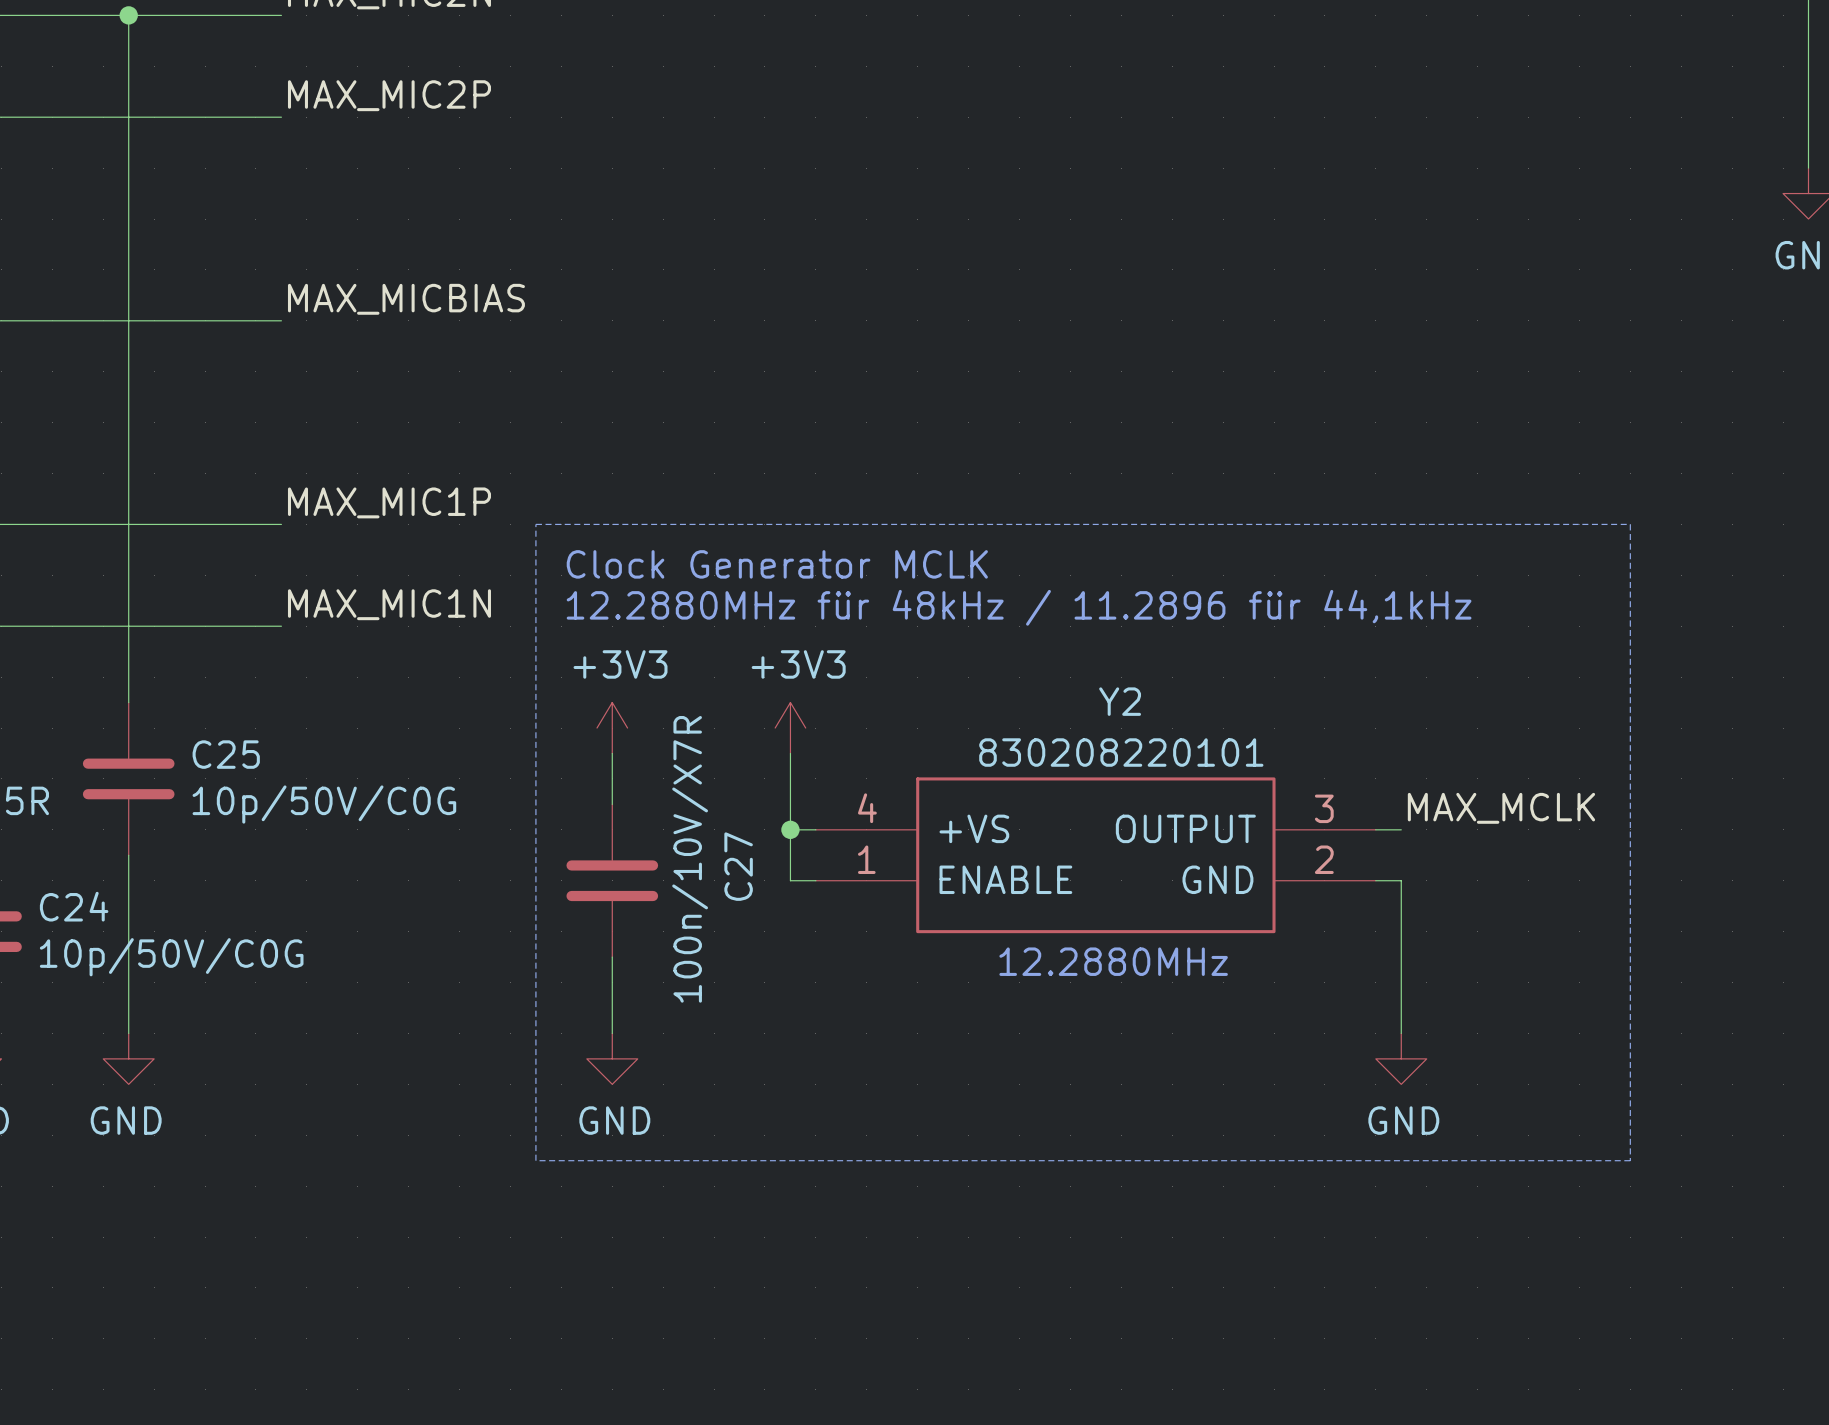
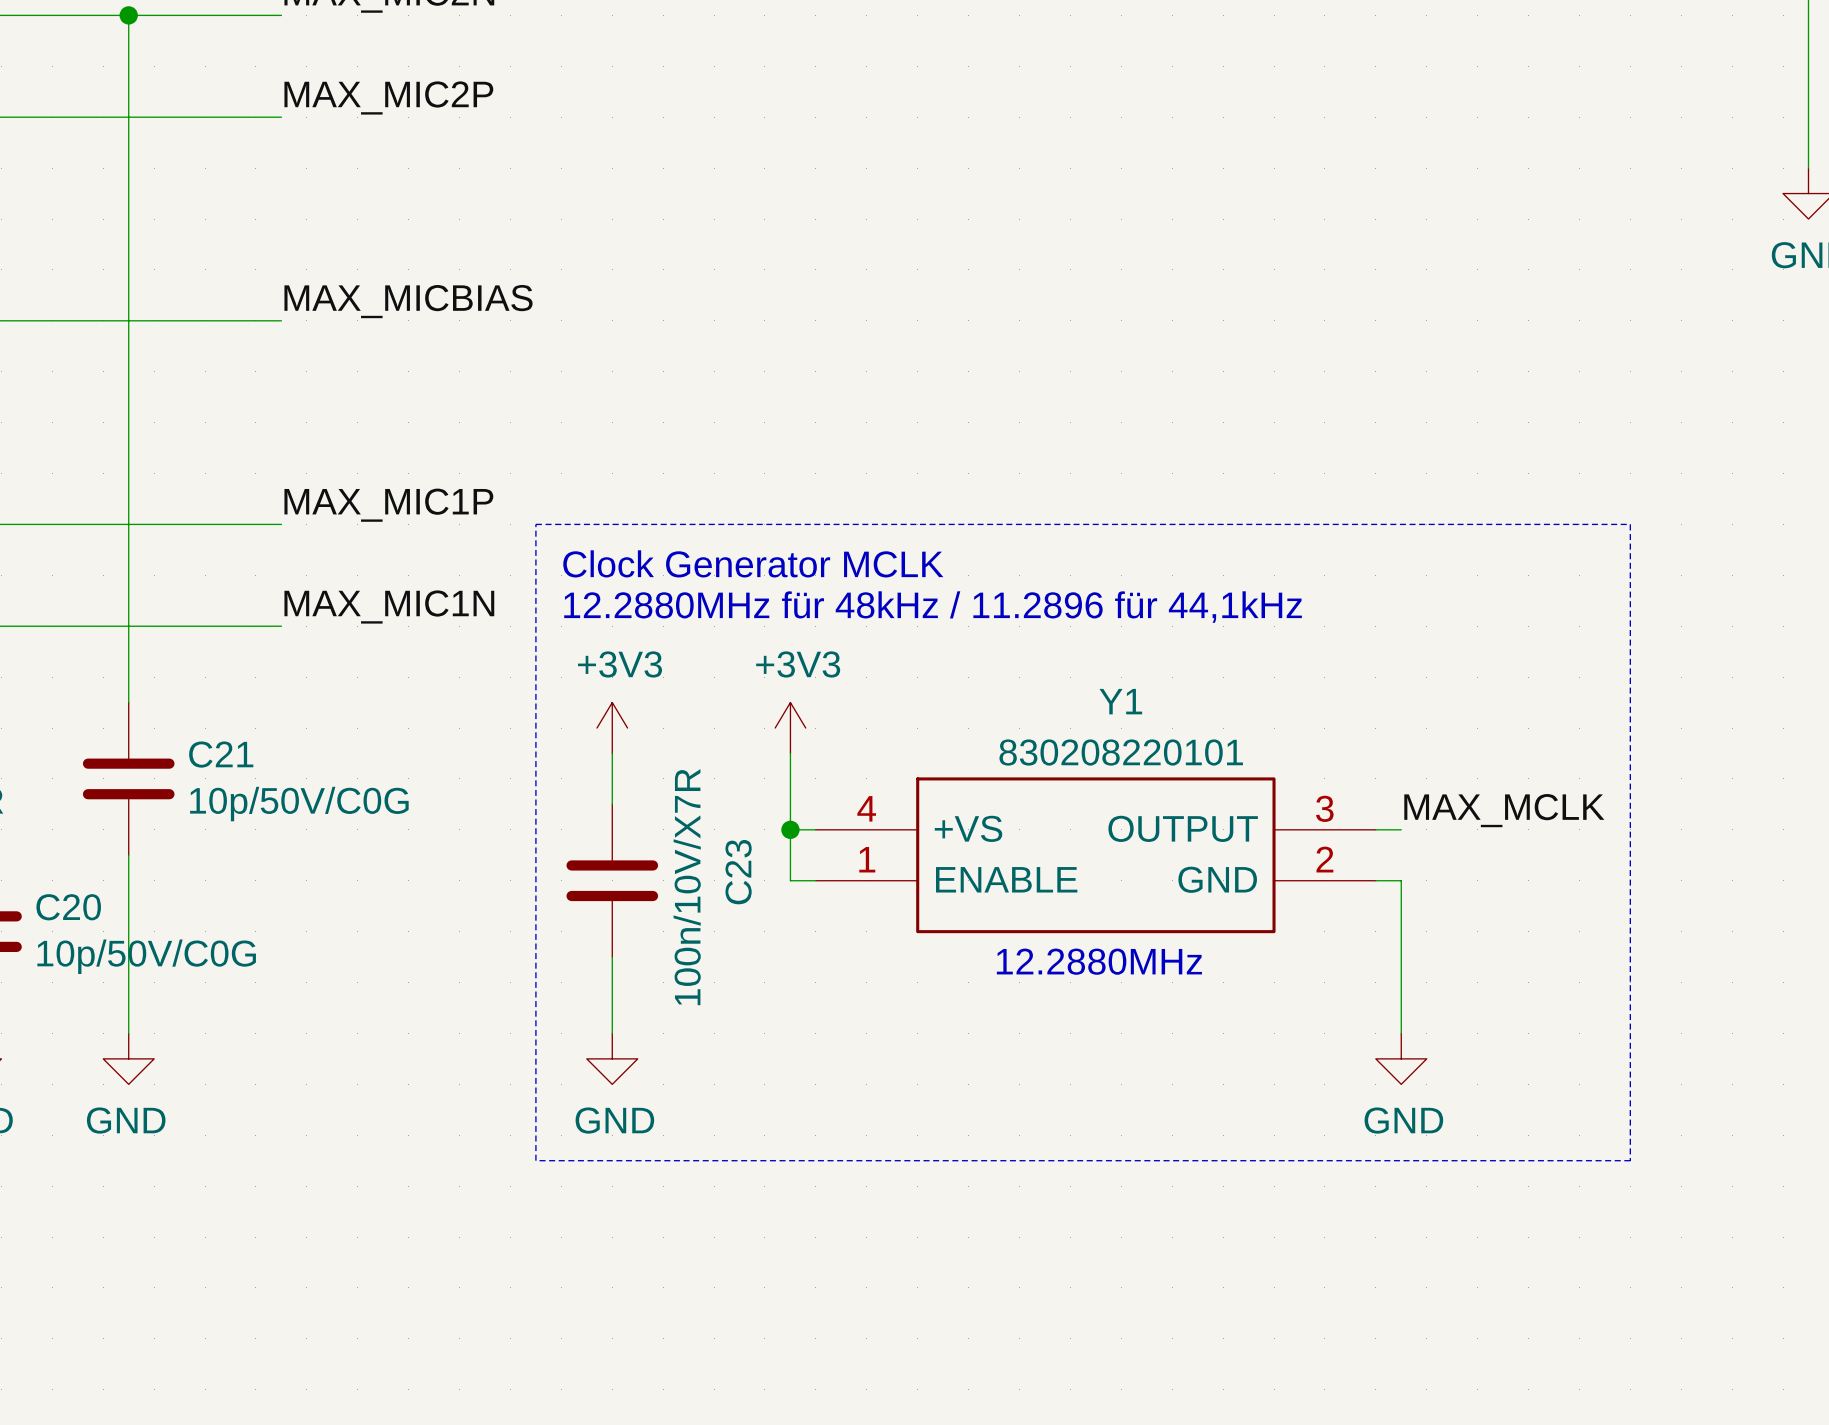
Y2 name: Y2 (1120, 701) -> Y1 (1120, 701)
C25 name: C25 (226, 754) -> C21 (221, 754)
C27 name: C27 (738, 866) -> C23 (738, 872)
C24 name: C24 (74, 906) -> C20 (68, 907)

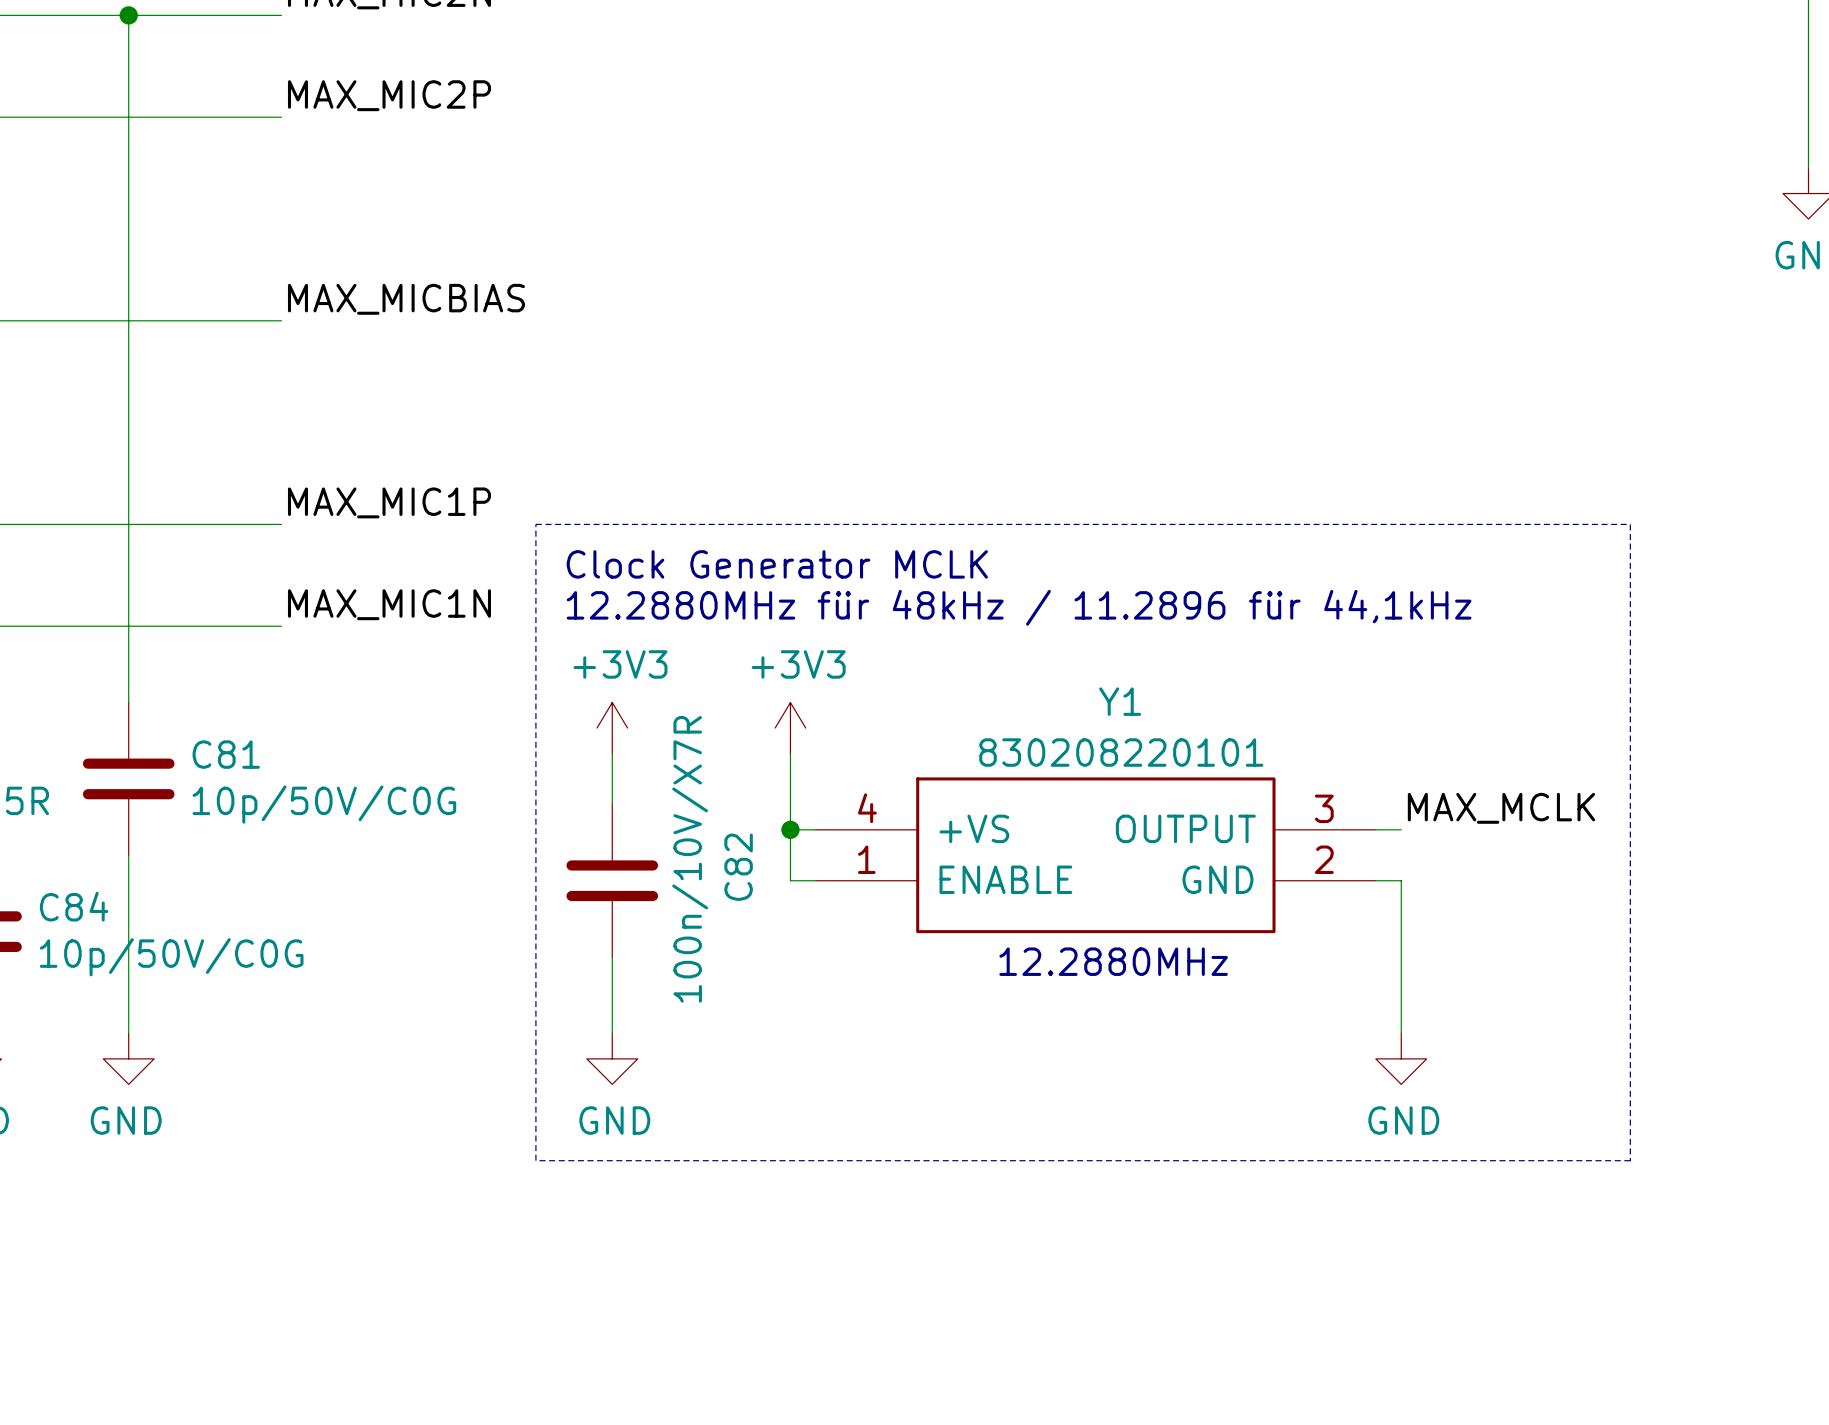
C21 name: C21 (221, 754) -> C81 (226, 754)
C23 name: C23 (738, 872) -> C82 (738, 867)
C20 name: C20 (68, 907) -> C84 (74, 906)

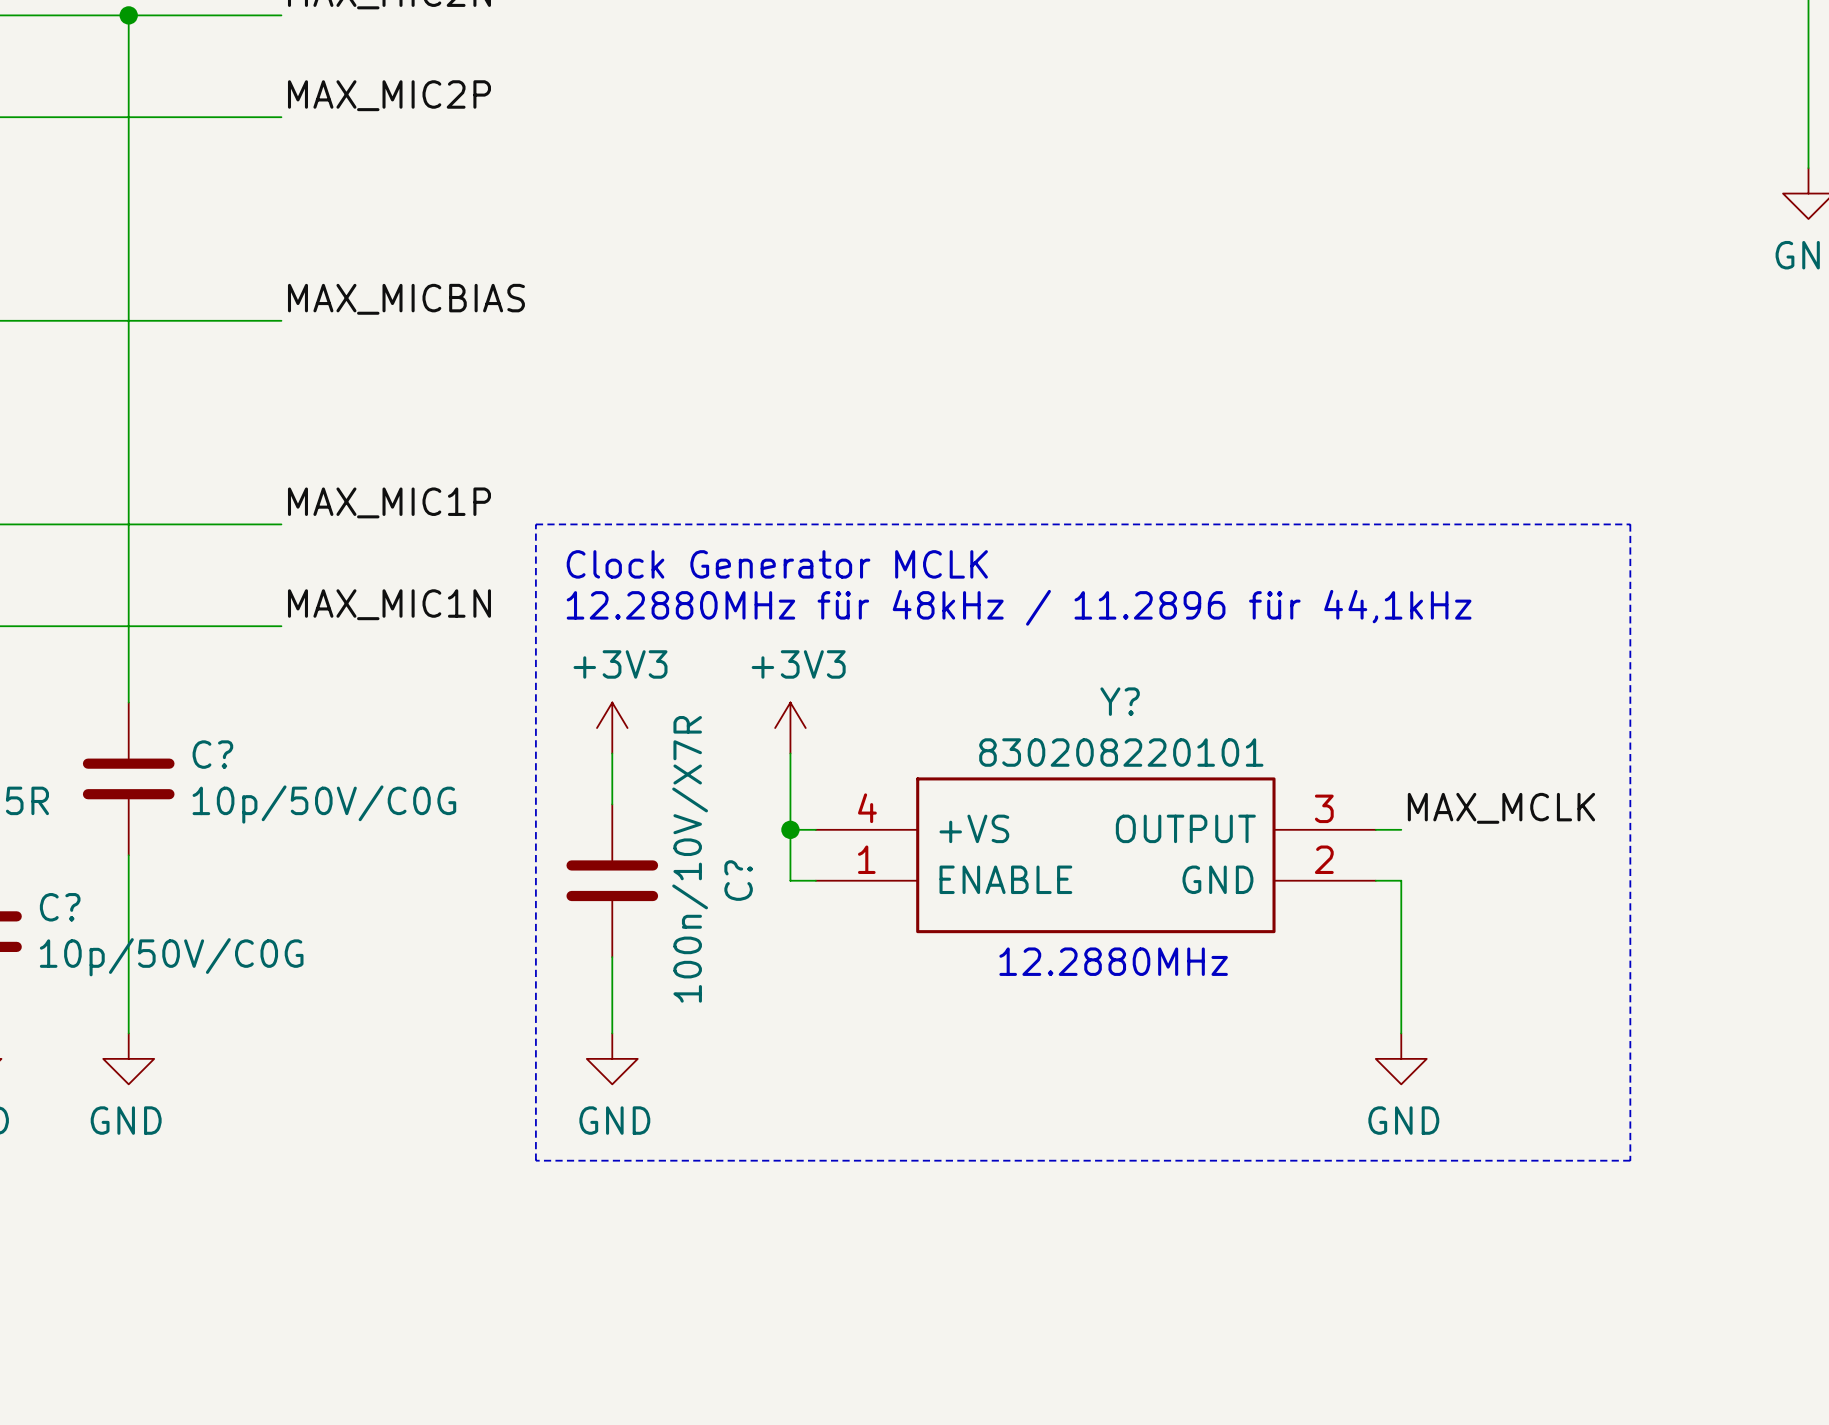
Y1 name: Y1 (1120, 701) -> Y? (1120, 701)
C81 name: C81 (226, 754) -> C? (212, 754)
C82 name: C82 (738, 867) -> C? (738, 880)
C84 name: C84 (74, 906) -> C? (60, 907)

